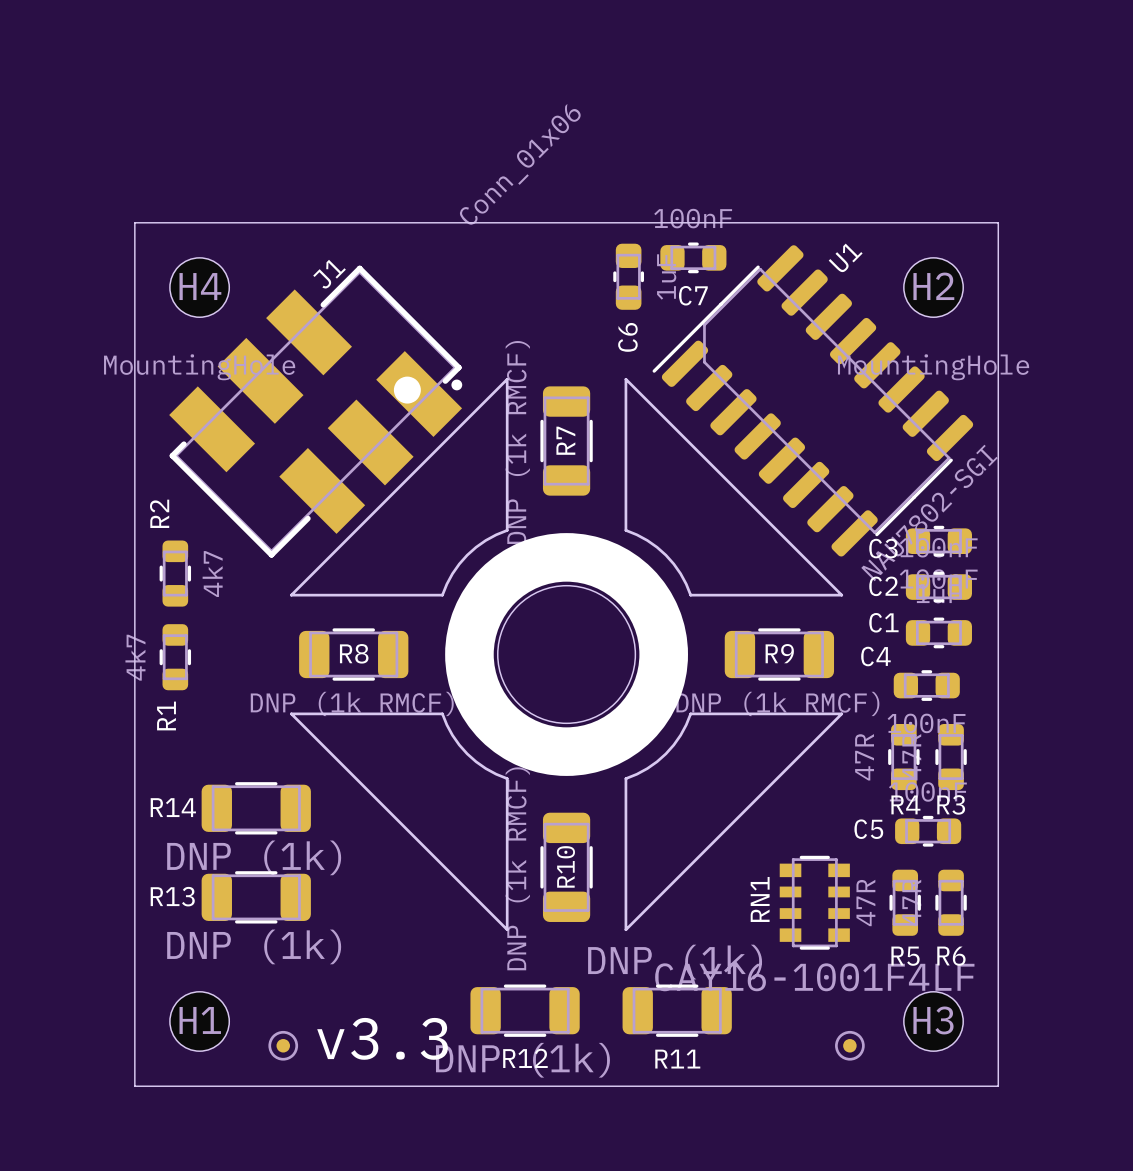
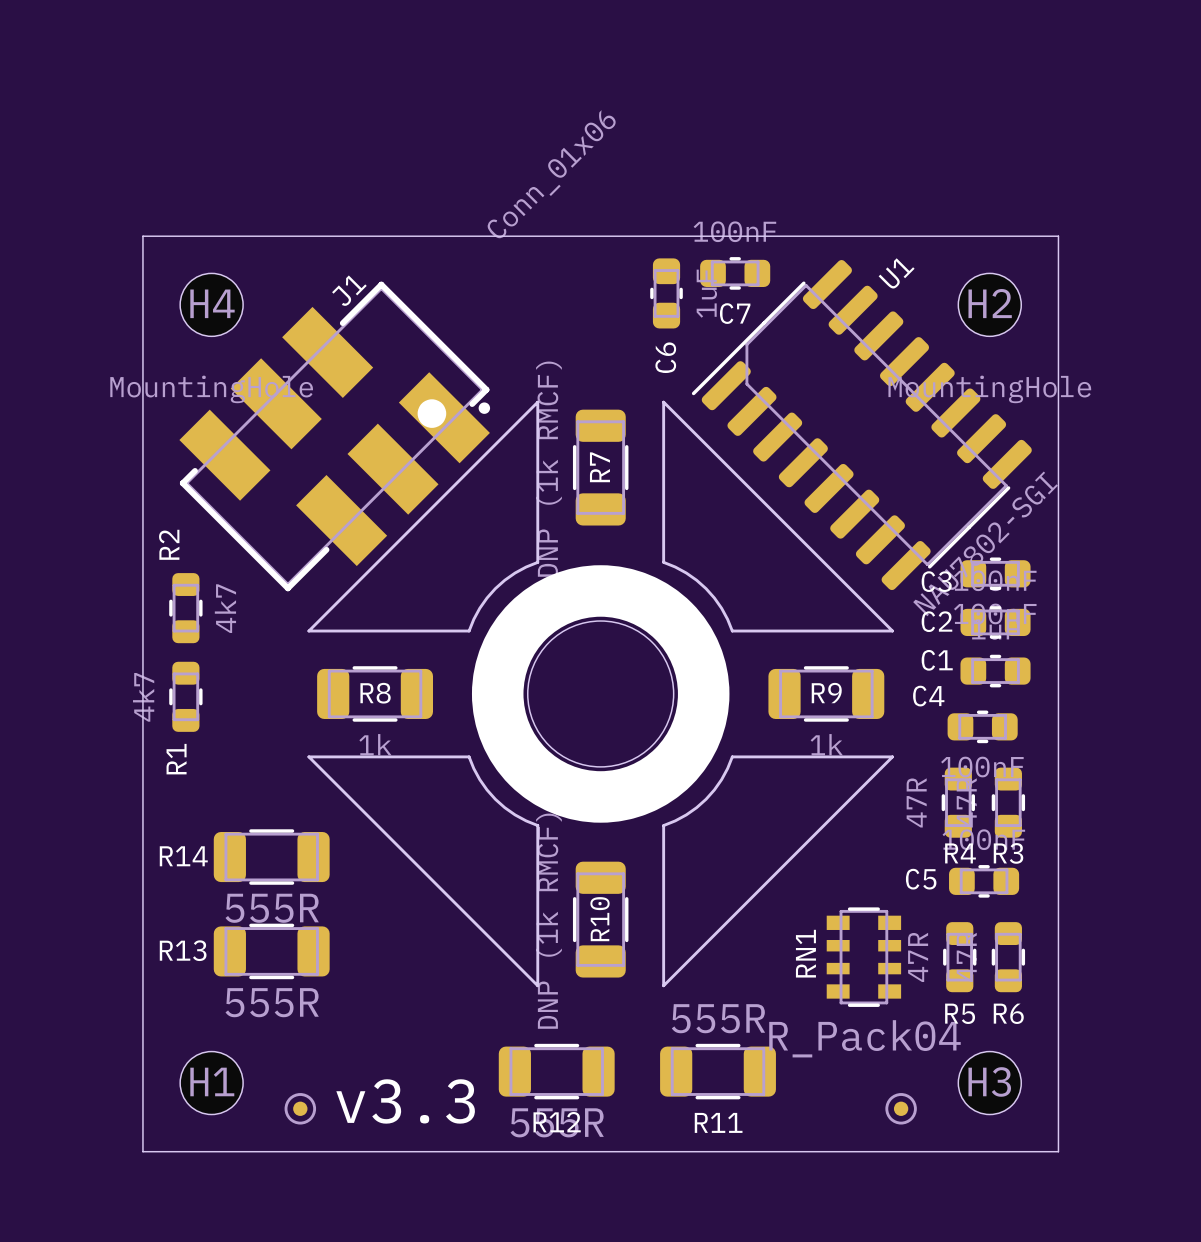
R8 value: DNP (1k RMCF) (352, 703) -> 1k (375, 744)
R9 value: DNP (1k RMCF) (777, 703) -> 1k (826, 744)
R14 value: DNP (1k) (254, 857) -> 555R (272, 908)
R13 value: DNP (1k) (254, 946) -> 555R (272, 1002)
R11 value: DNP (1k) (675, 962) -> 555R (718, 1018)
RN1 value: CAY16-1001F4LF (814, 977) -> R_Pack04 (864, 1038)
R12 value: DNP (1k) (522, 1060) -> 555R (557, 1122)

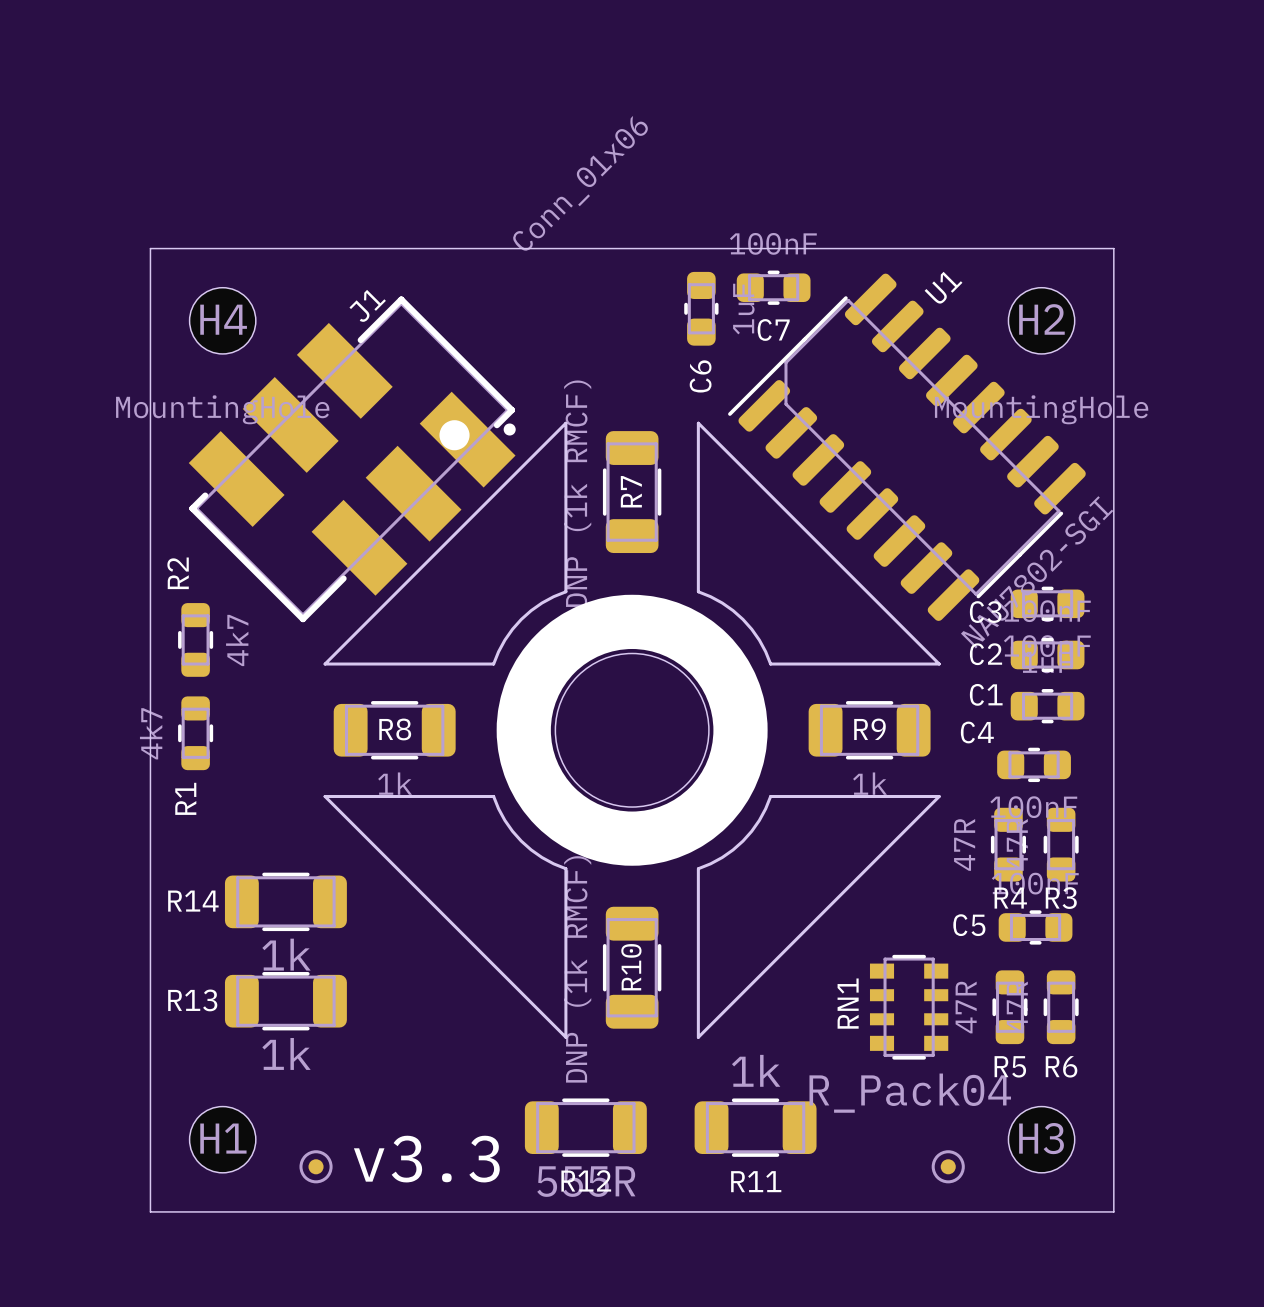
R14 value: 555R (272, 908) -> 1k (286, 954)
R13 value: 555R (272, 1002) -> 1k (286, 1053)
R11 value: 555R (718, 1018) -> 1k (756, 1070)

